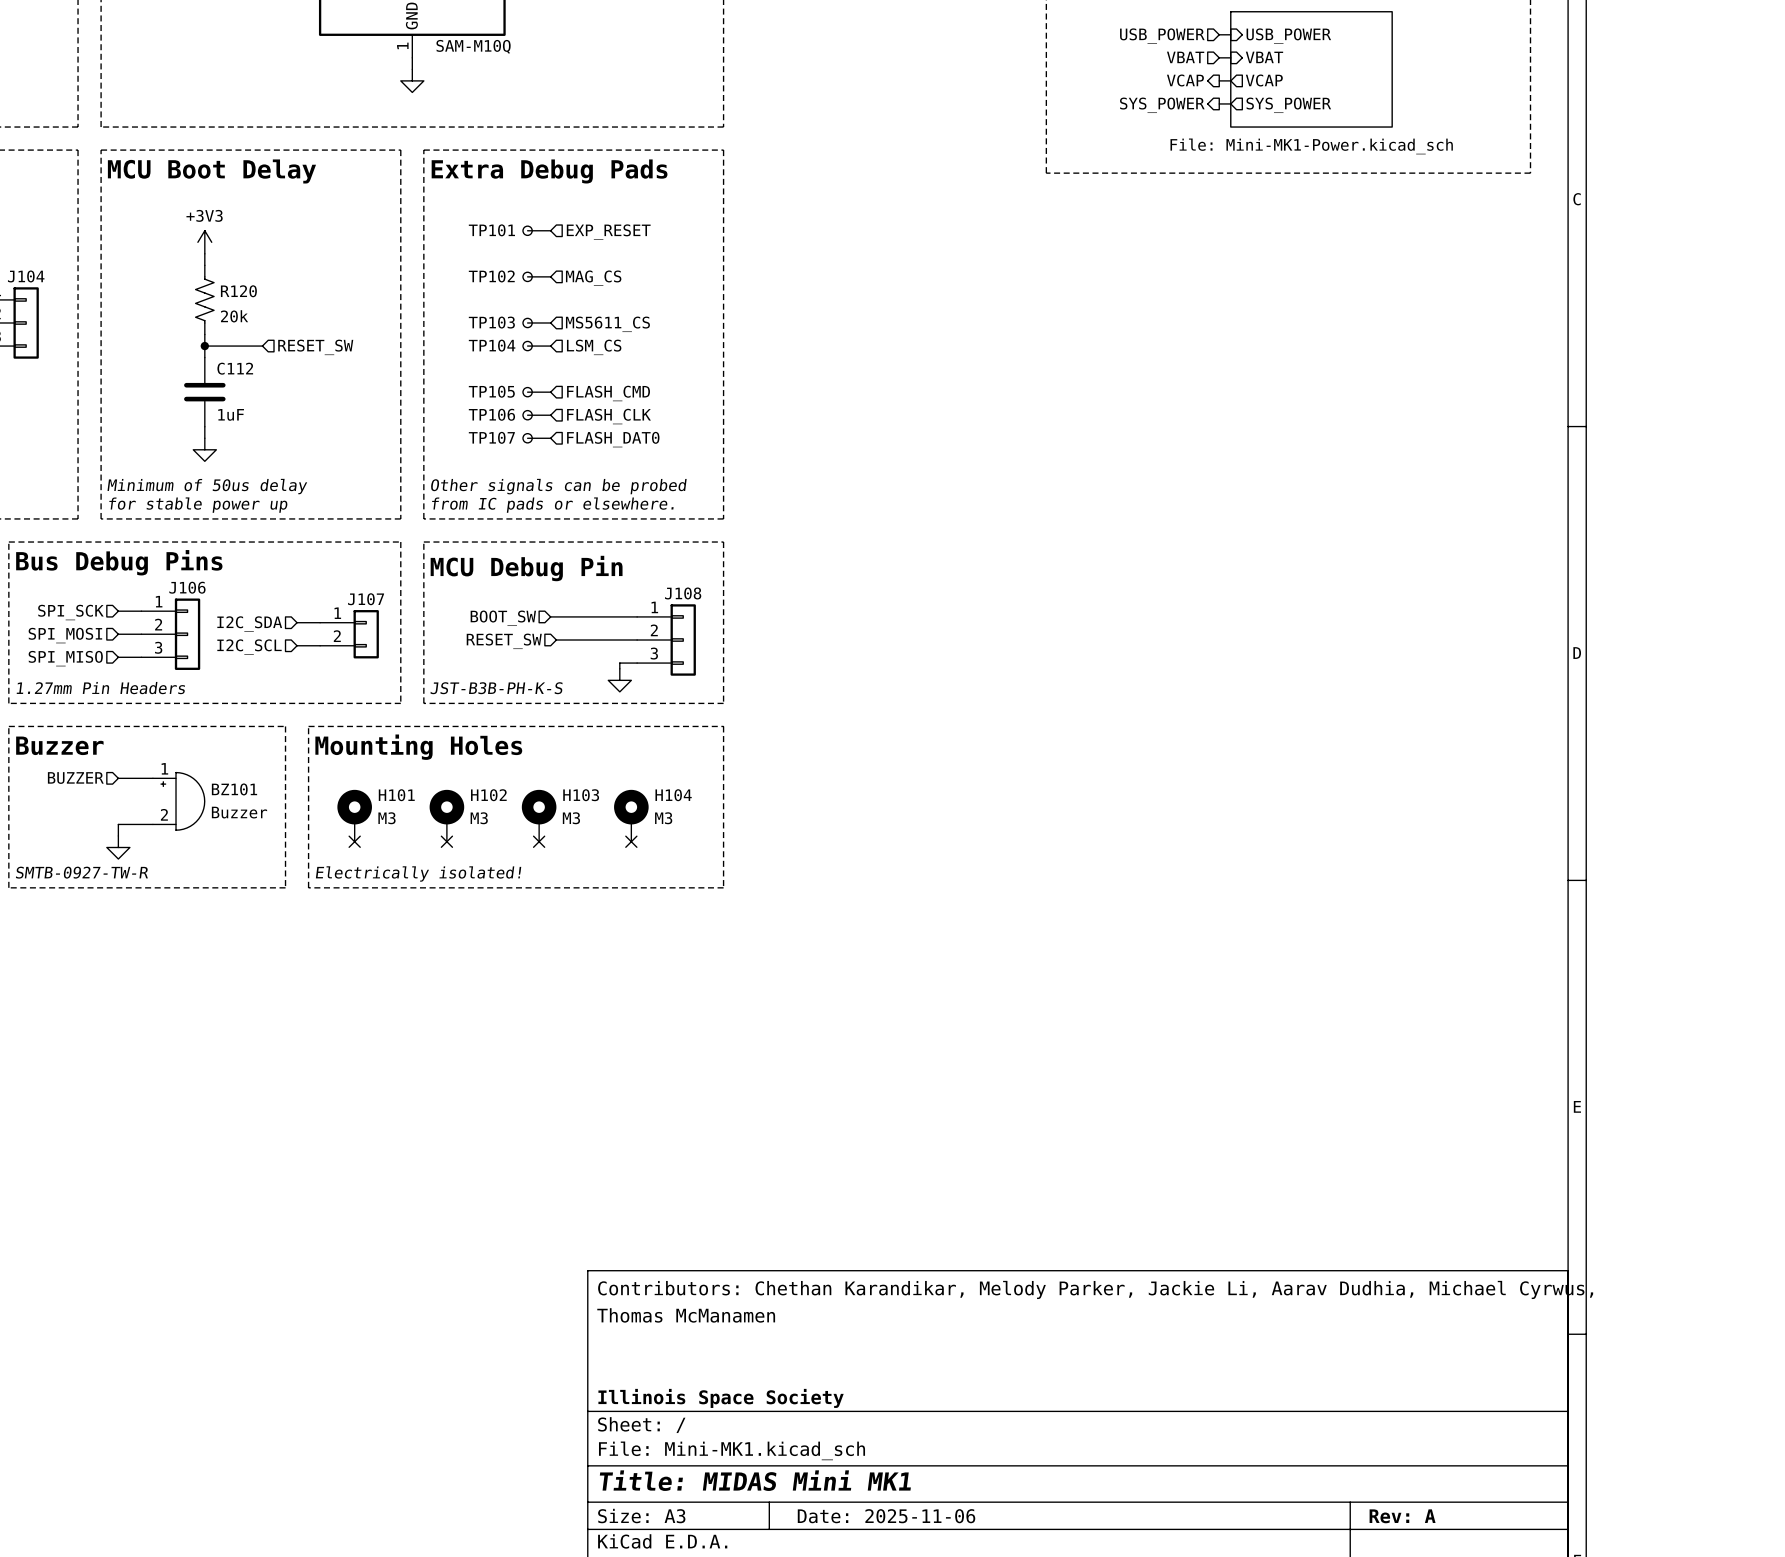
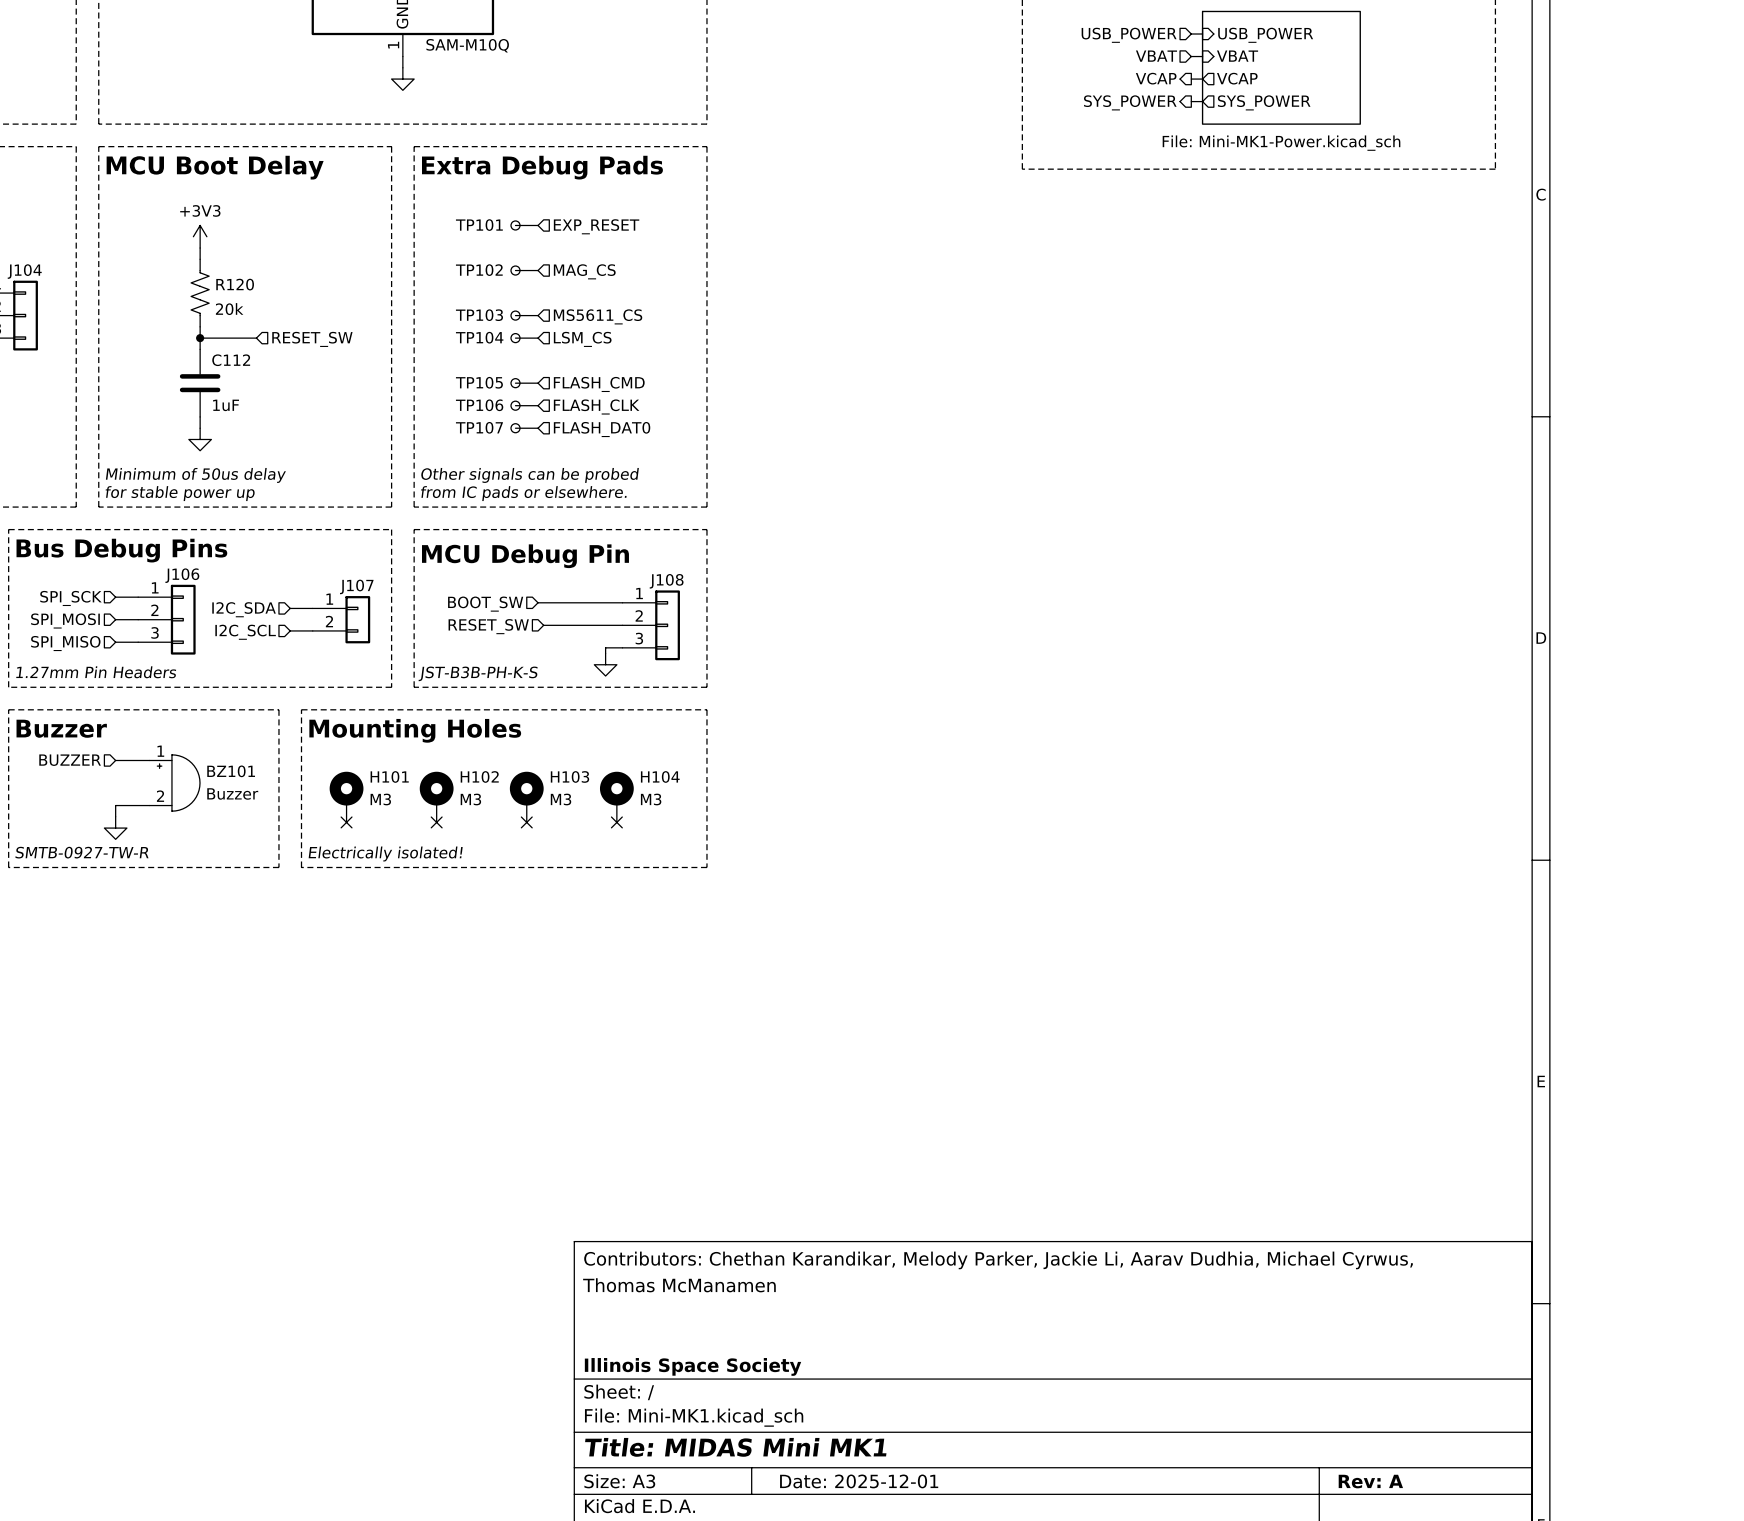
title block: Date: 2025-11-06 (886, 1516) -> Date: 2025-12-01 (859, 1481)

